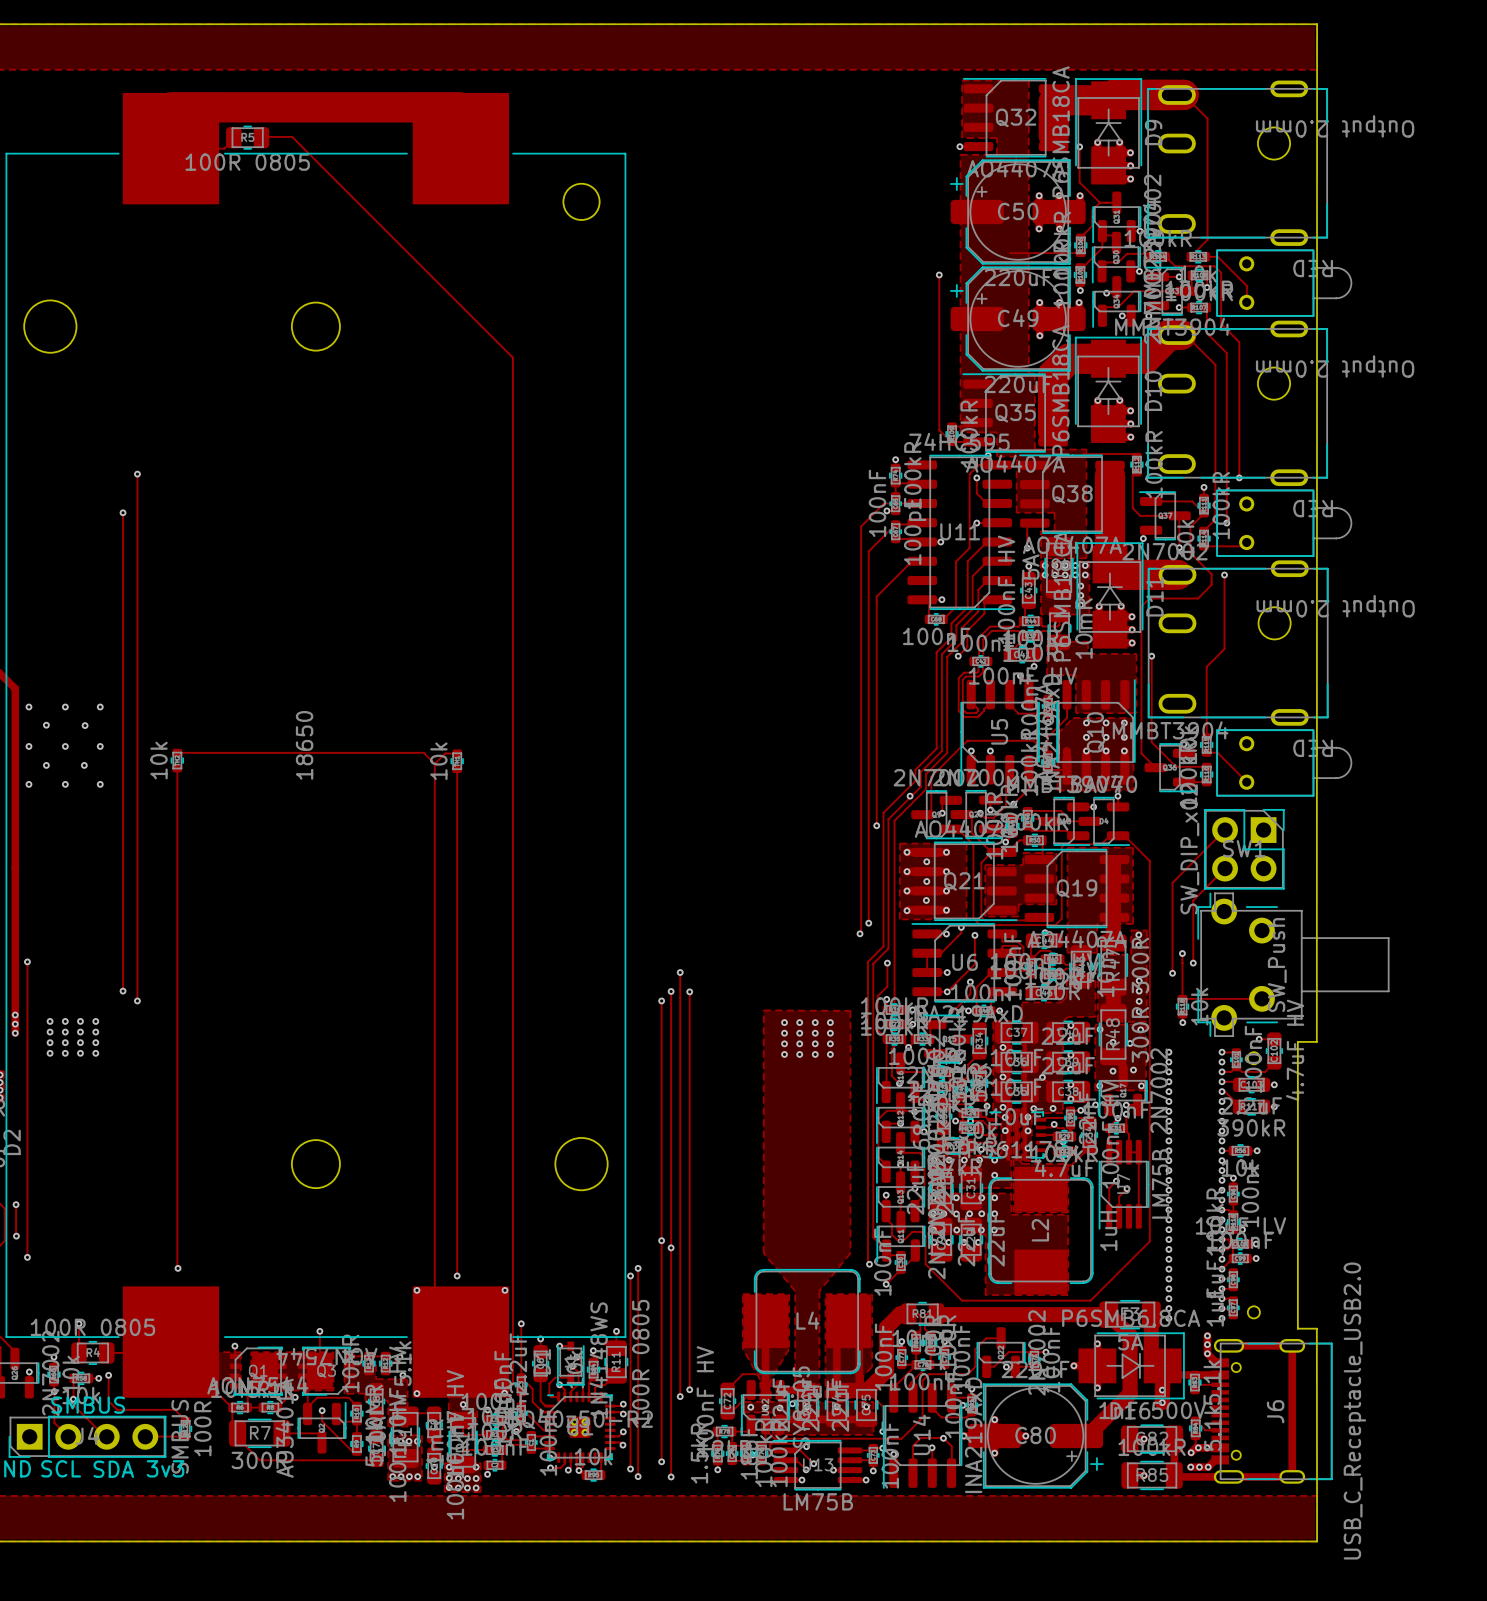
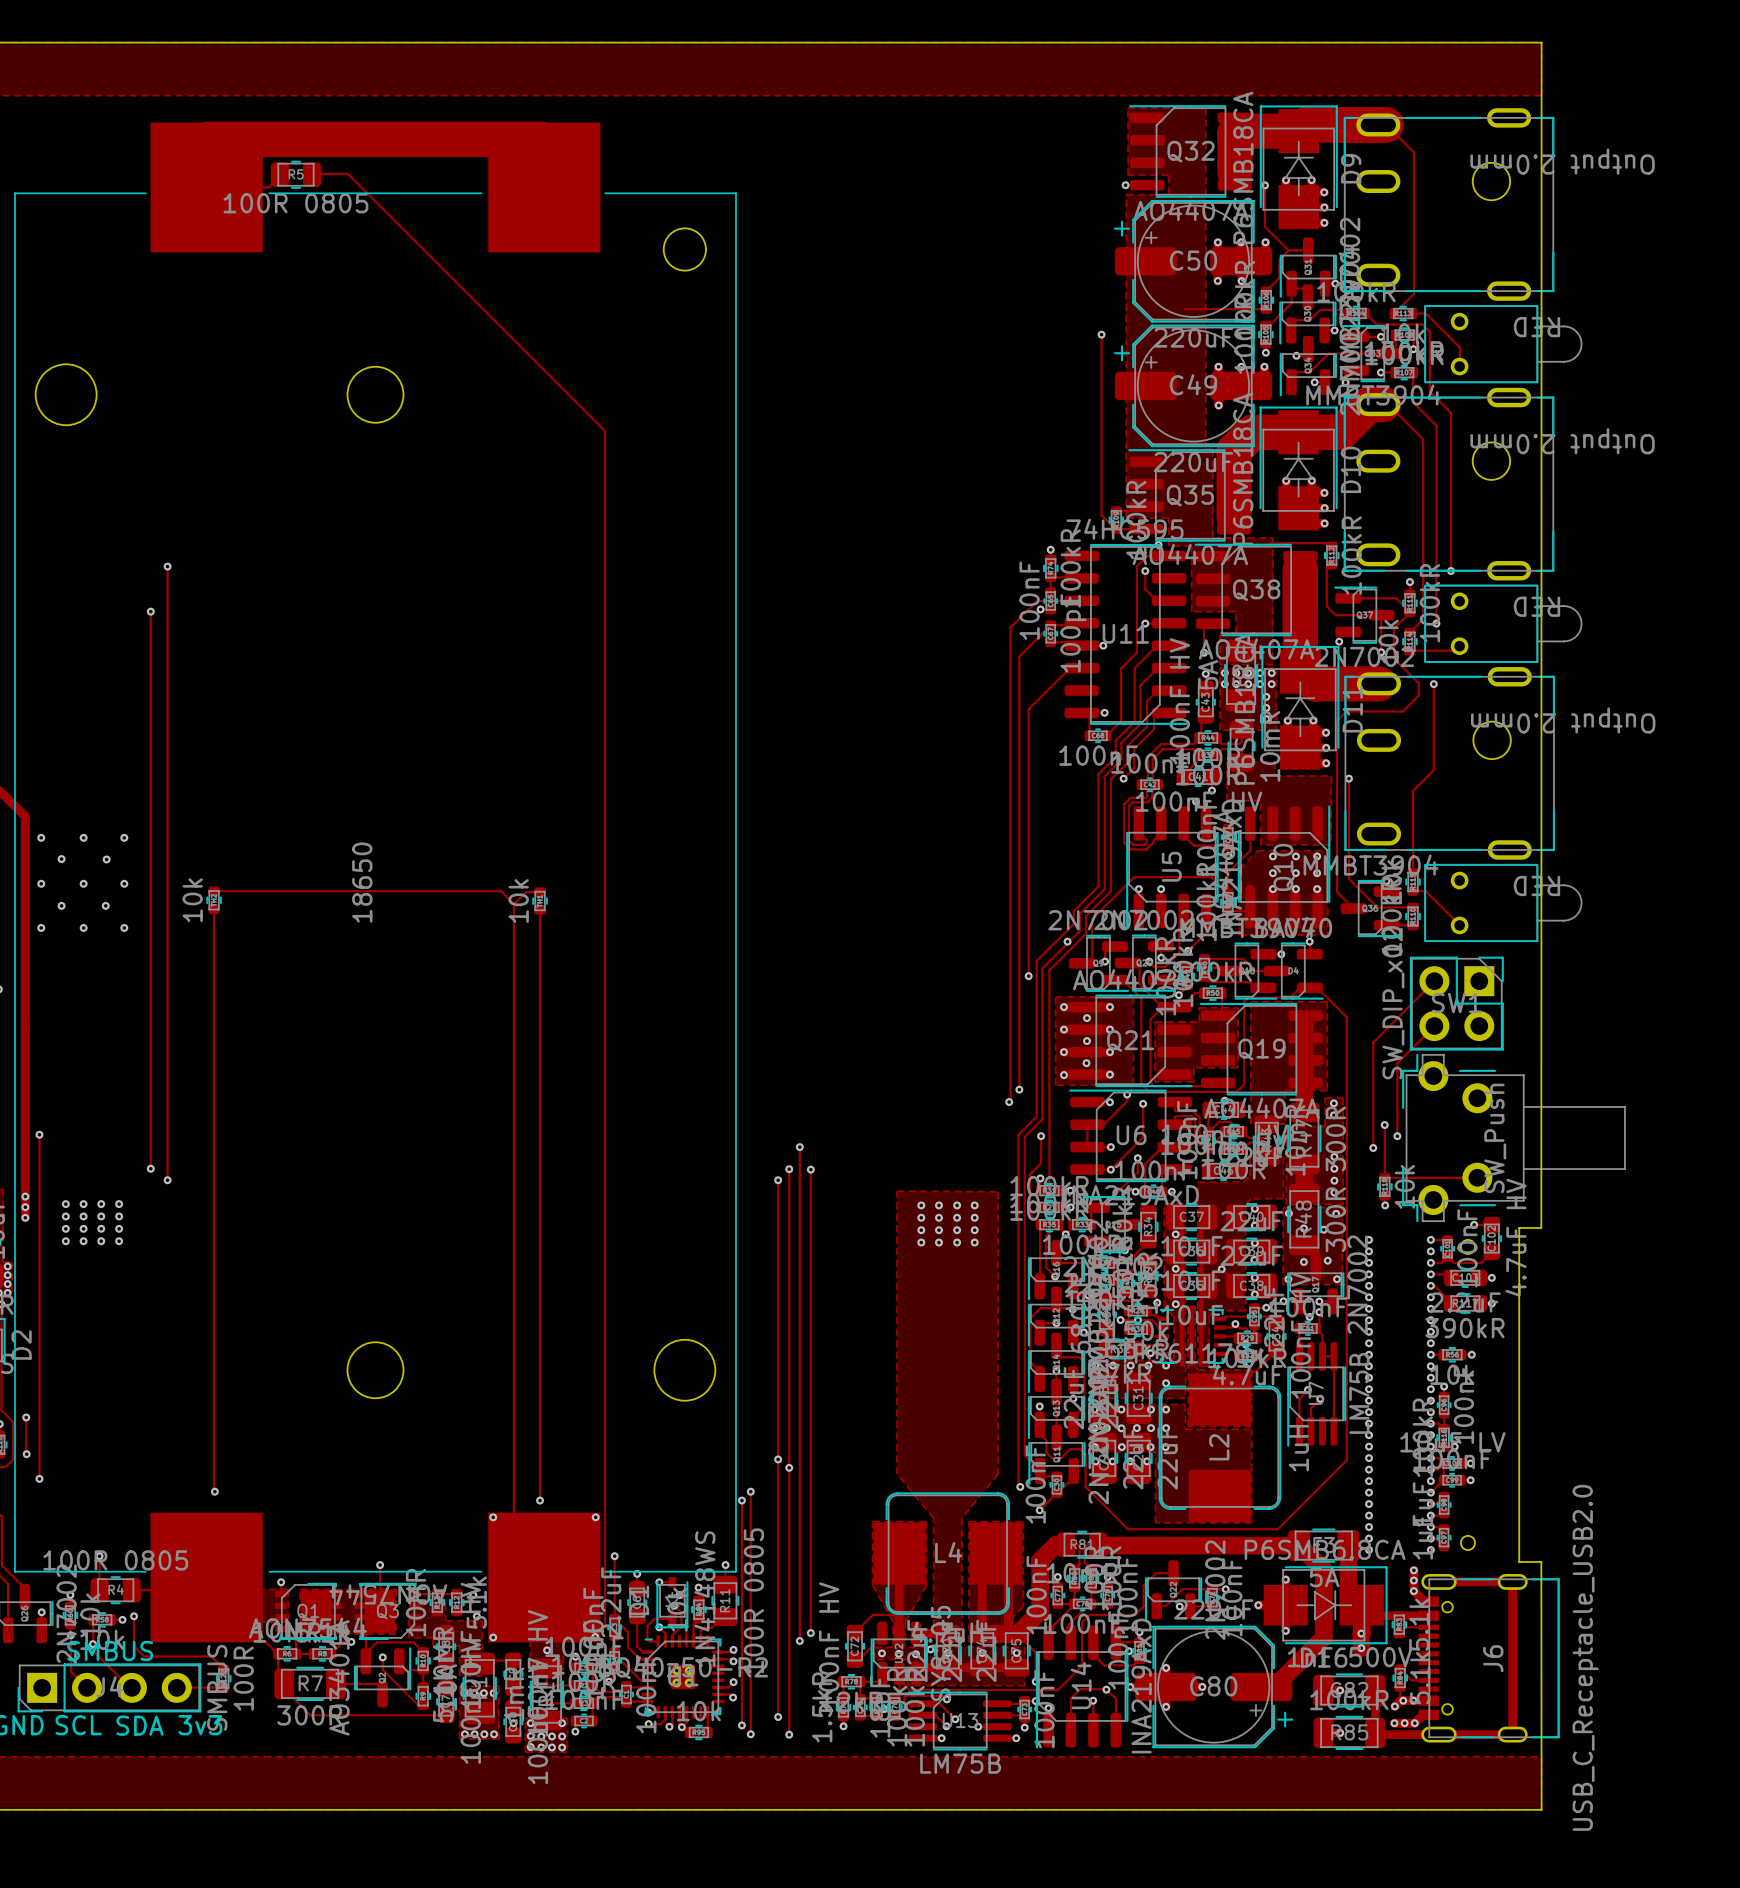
via: (1033, 1108) -> none
via: (1053, 1108) -> none
via: (1005, 1117) -> none
via: (1028, 1117) -> none
via: (1005, 1130) -> none
via: (1028, 1130) -> none
via: (1005, 1147) -> none
via: (1028, 1148) -> none

